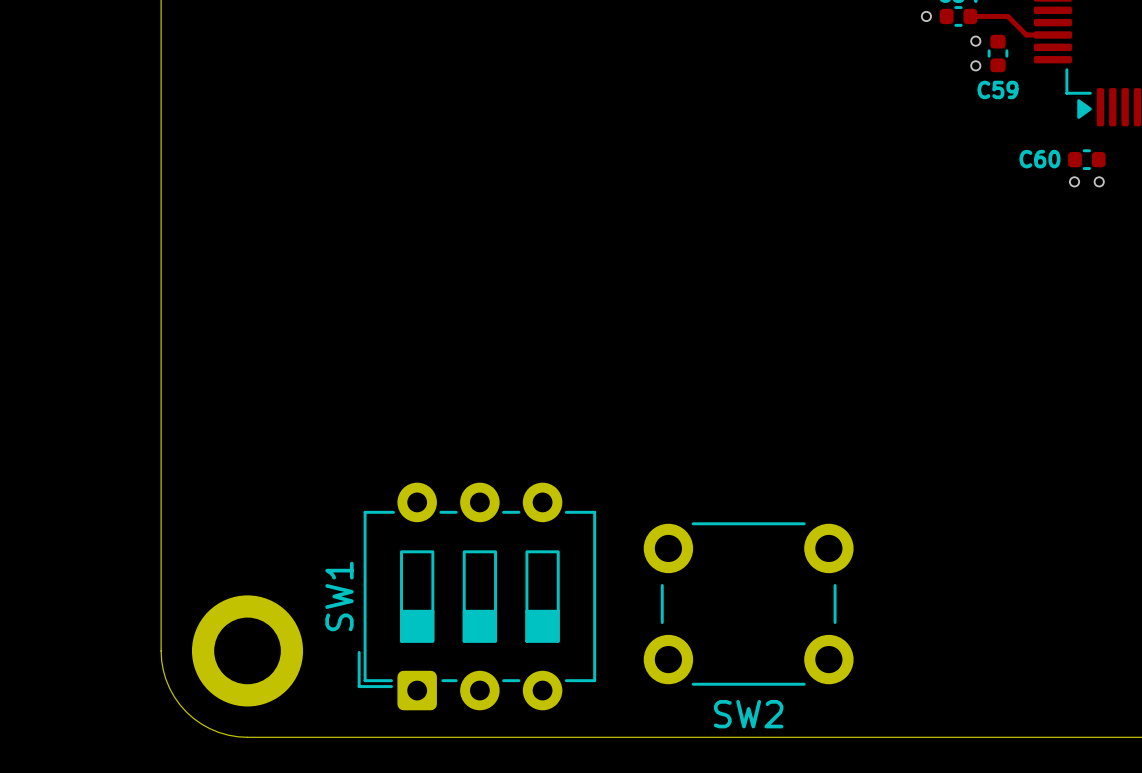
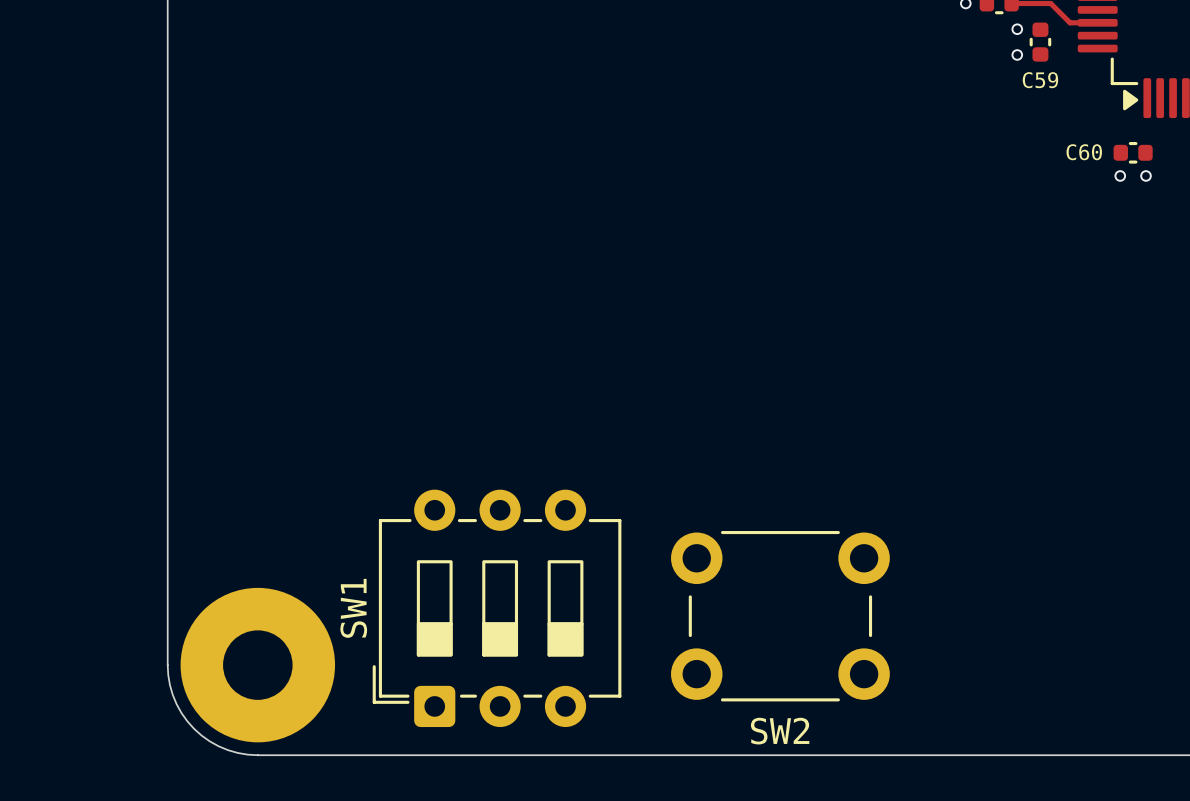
part footprint: [191, 595, 304, 707] -> [180, 587, 336, 743]

